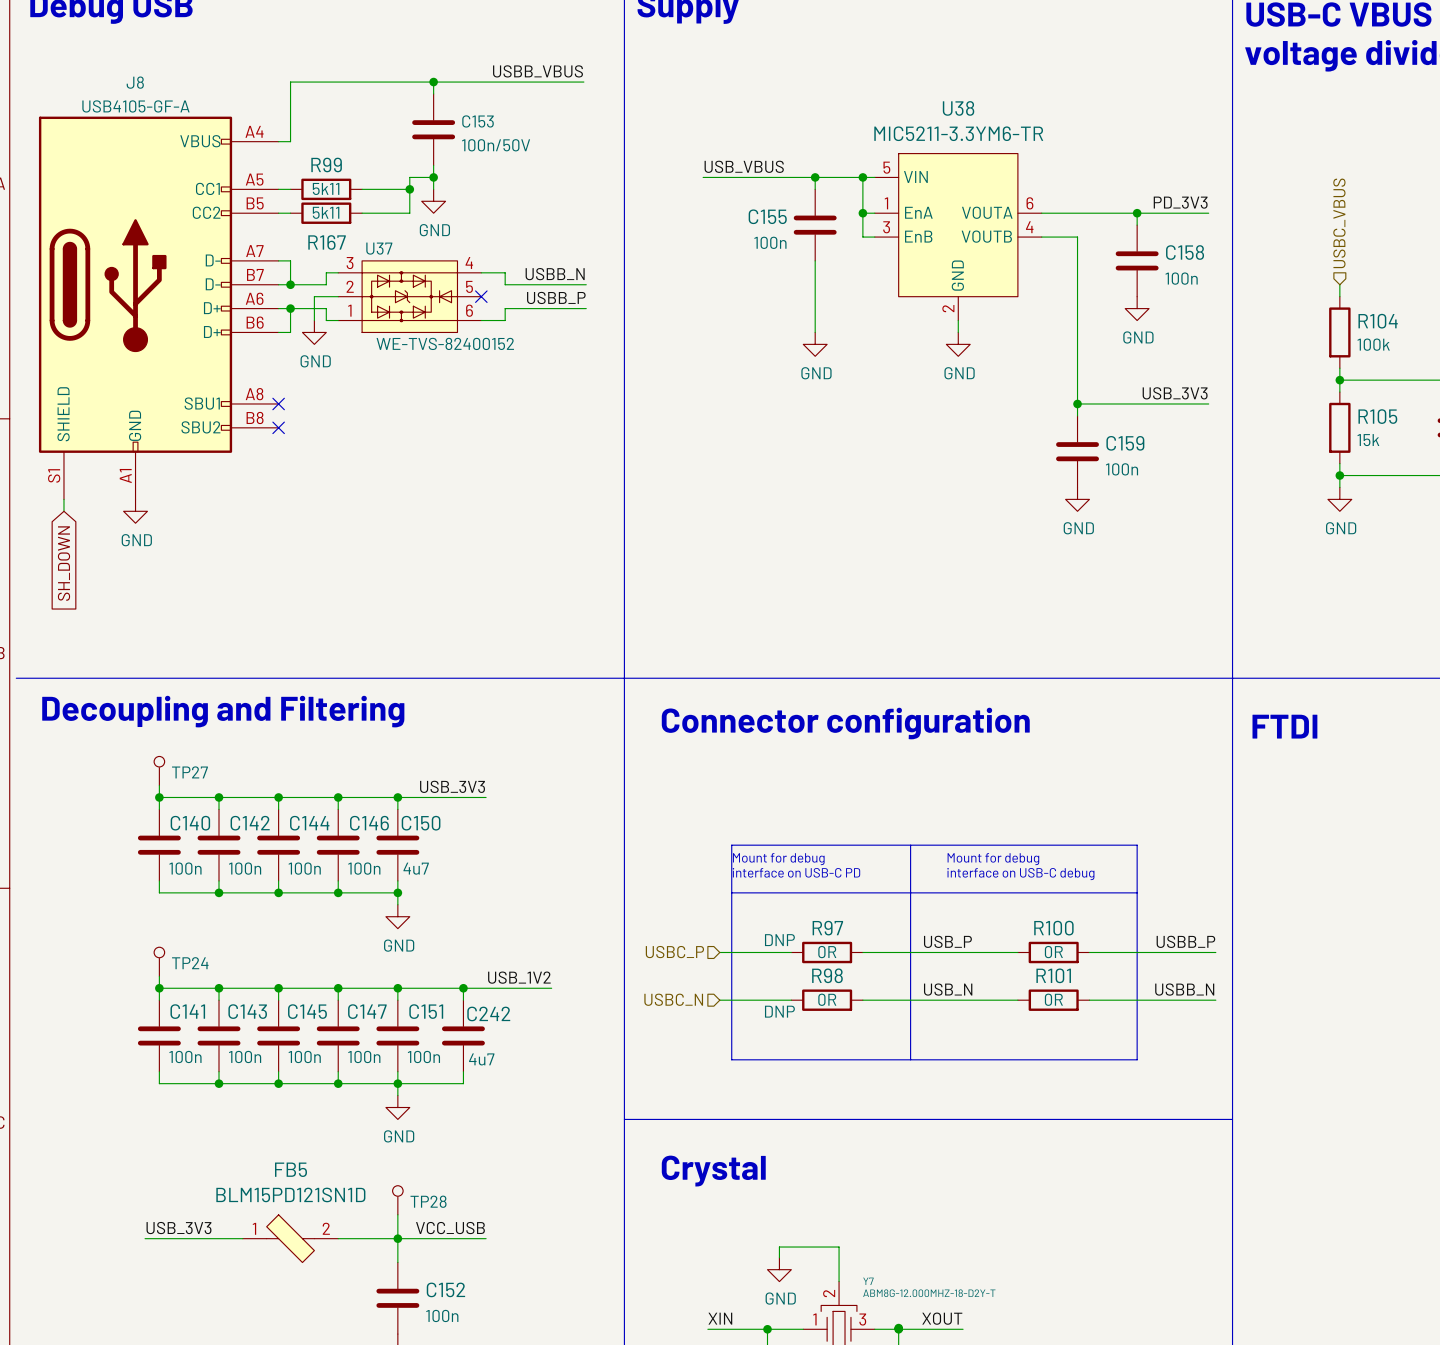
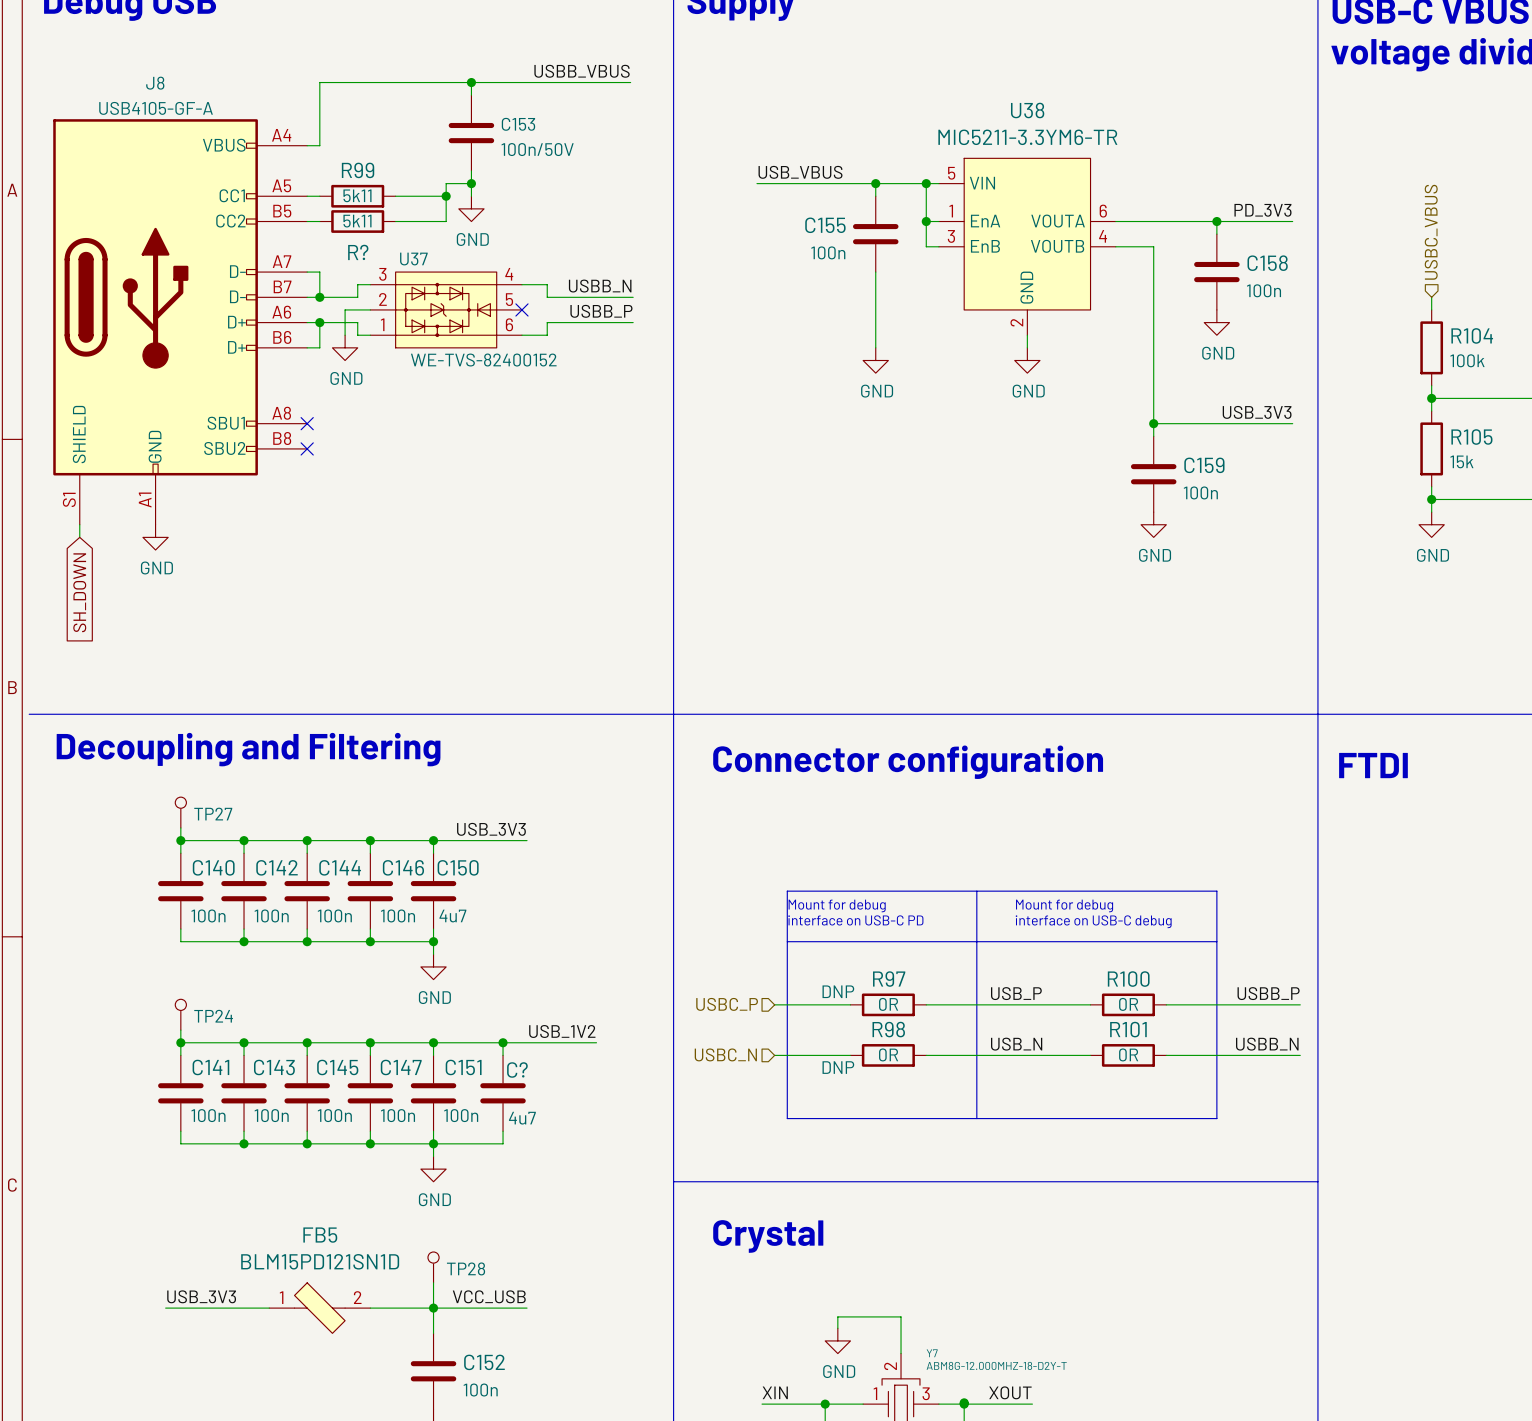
R167 name: R167 (327, 242) -> R? (358, 252)
C242 name: C242 (488, 1013) -> C? (517, 1070)

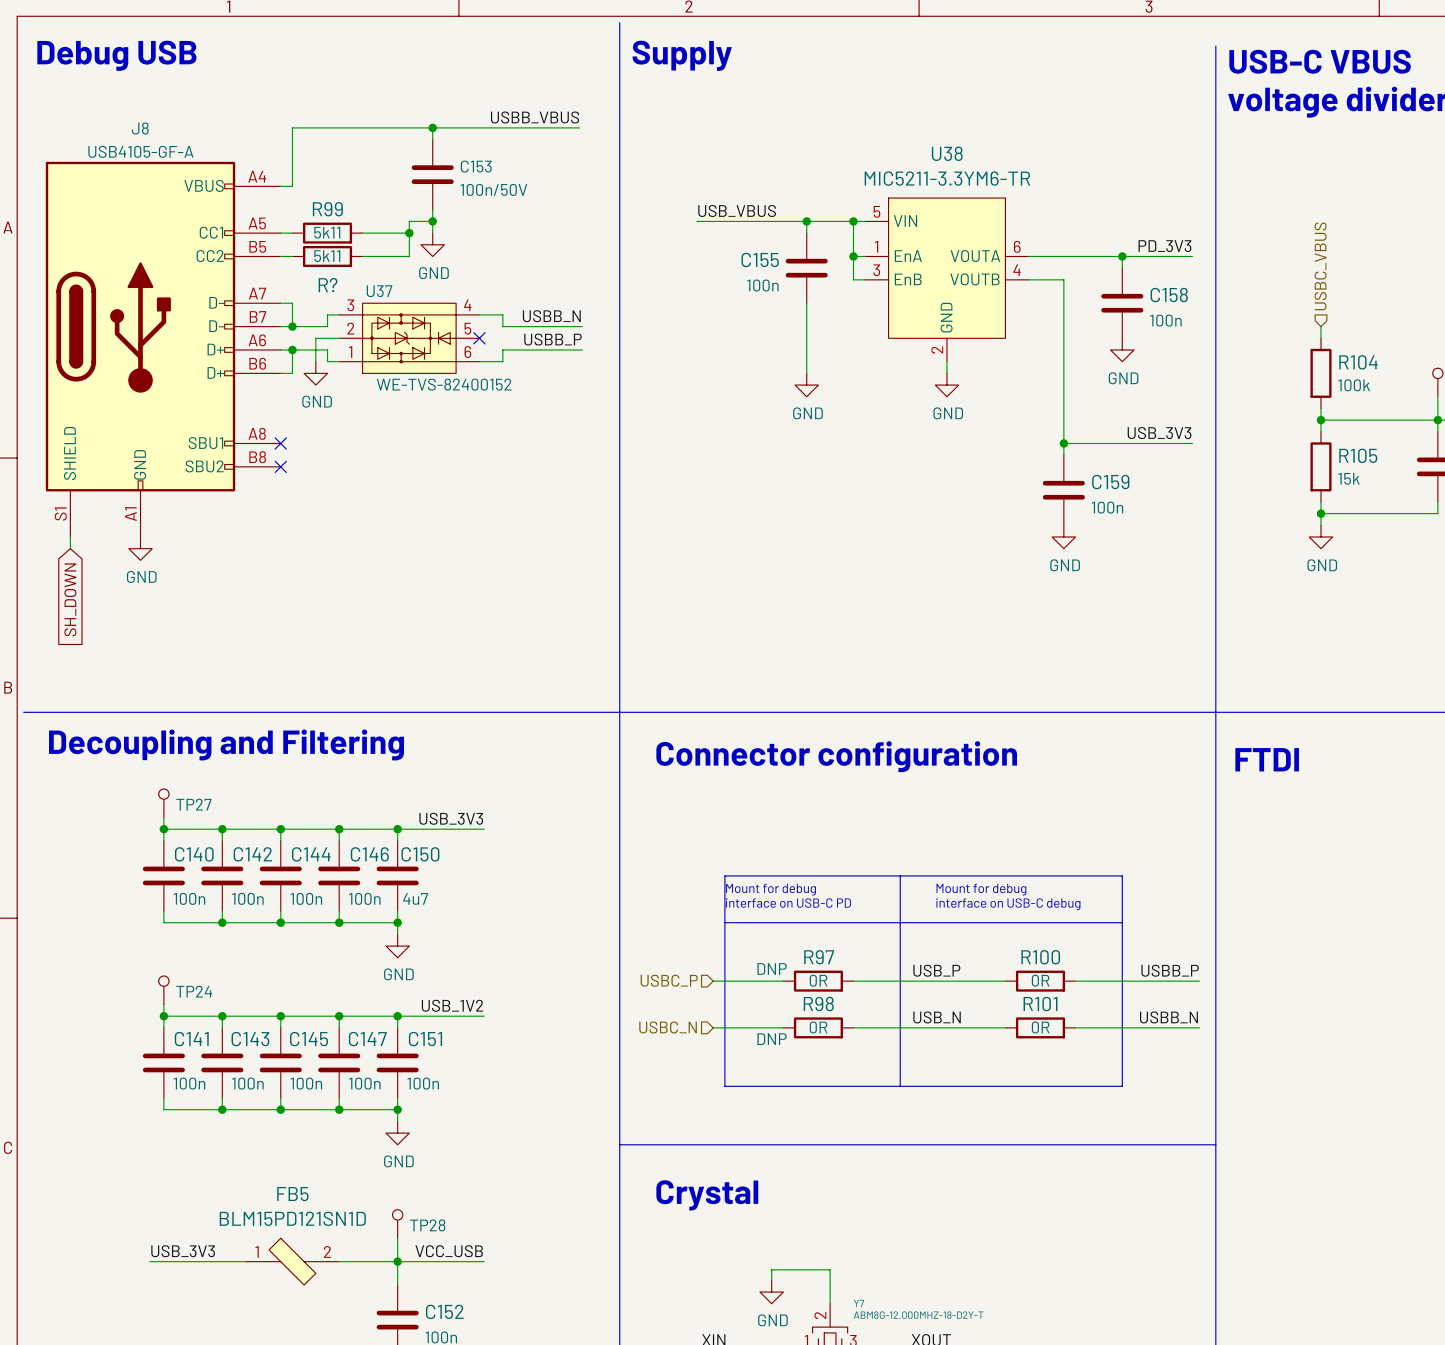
label position: USB_1V2 (562, 1031) -> USB_1V2 (452, 1005)
wire: (503, 1042) (503, 1055) -> none
junction: (503, 1042) -> none
wire: (527, 1042) (596, 1042) -> none
C?: (503, 1093) -> none
wire: (503, 1131) (503, 1143) (433, 1143) -> none

